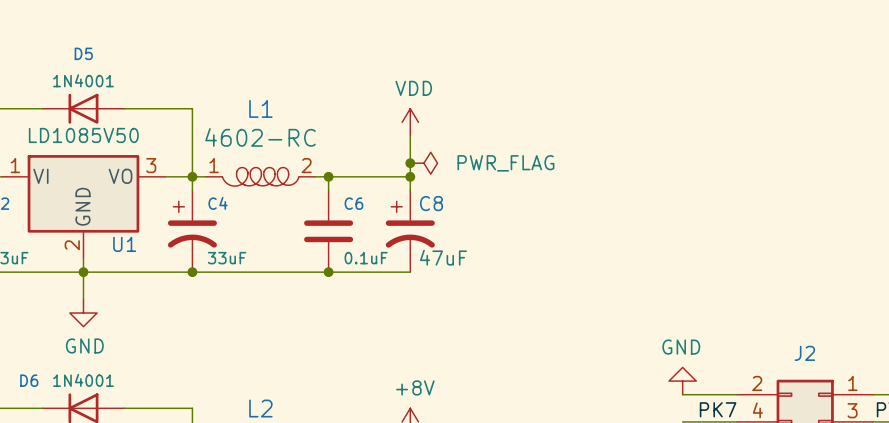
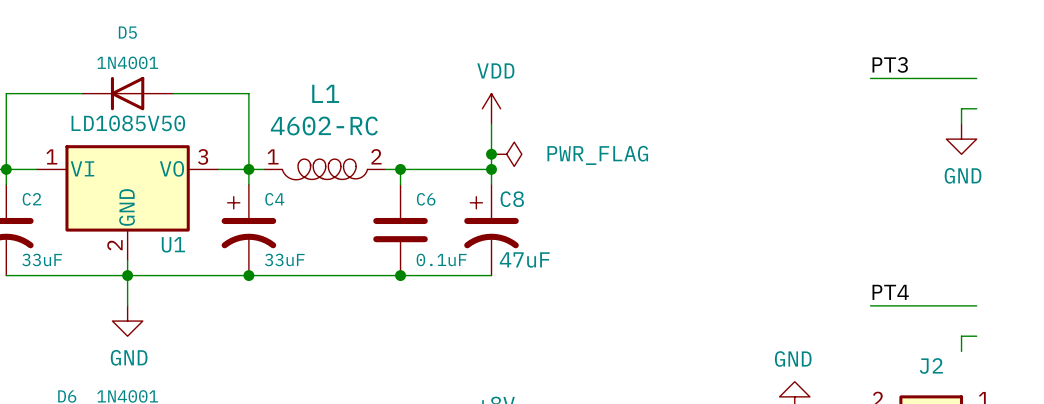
label: none -> PT3 (890, 64)
wire: none -> (870, 78) (976, 78)
wire: none -> (976, 108) (961, 108) (961, 123)
power symbol: none -> GND (961, 139)
label: none -> PT4 (890, 292)
wire: none -> (870, 305) (976, 305)
wire: none -> (976, 336) (961, 336) (961, 351)

